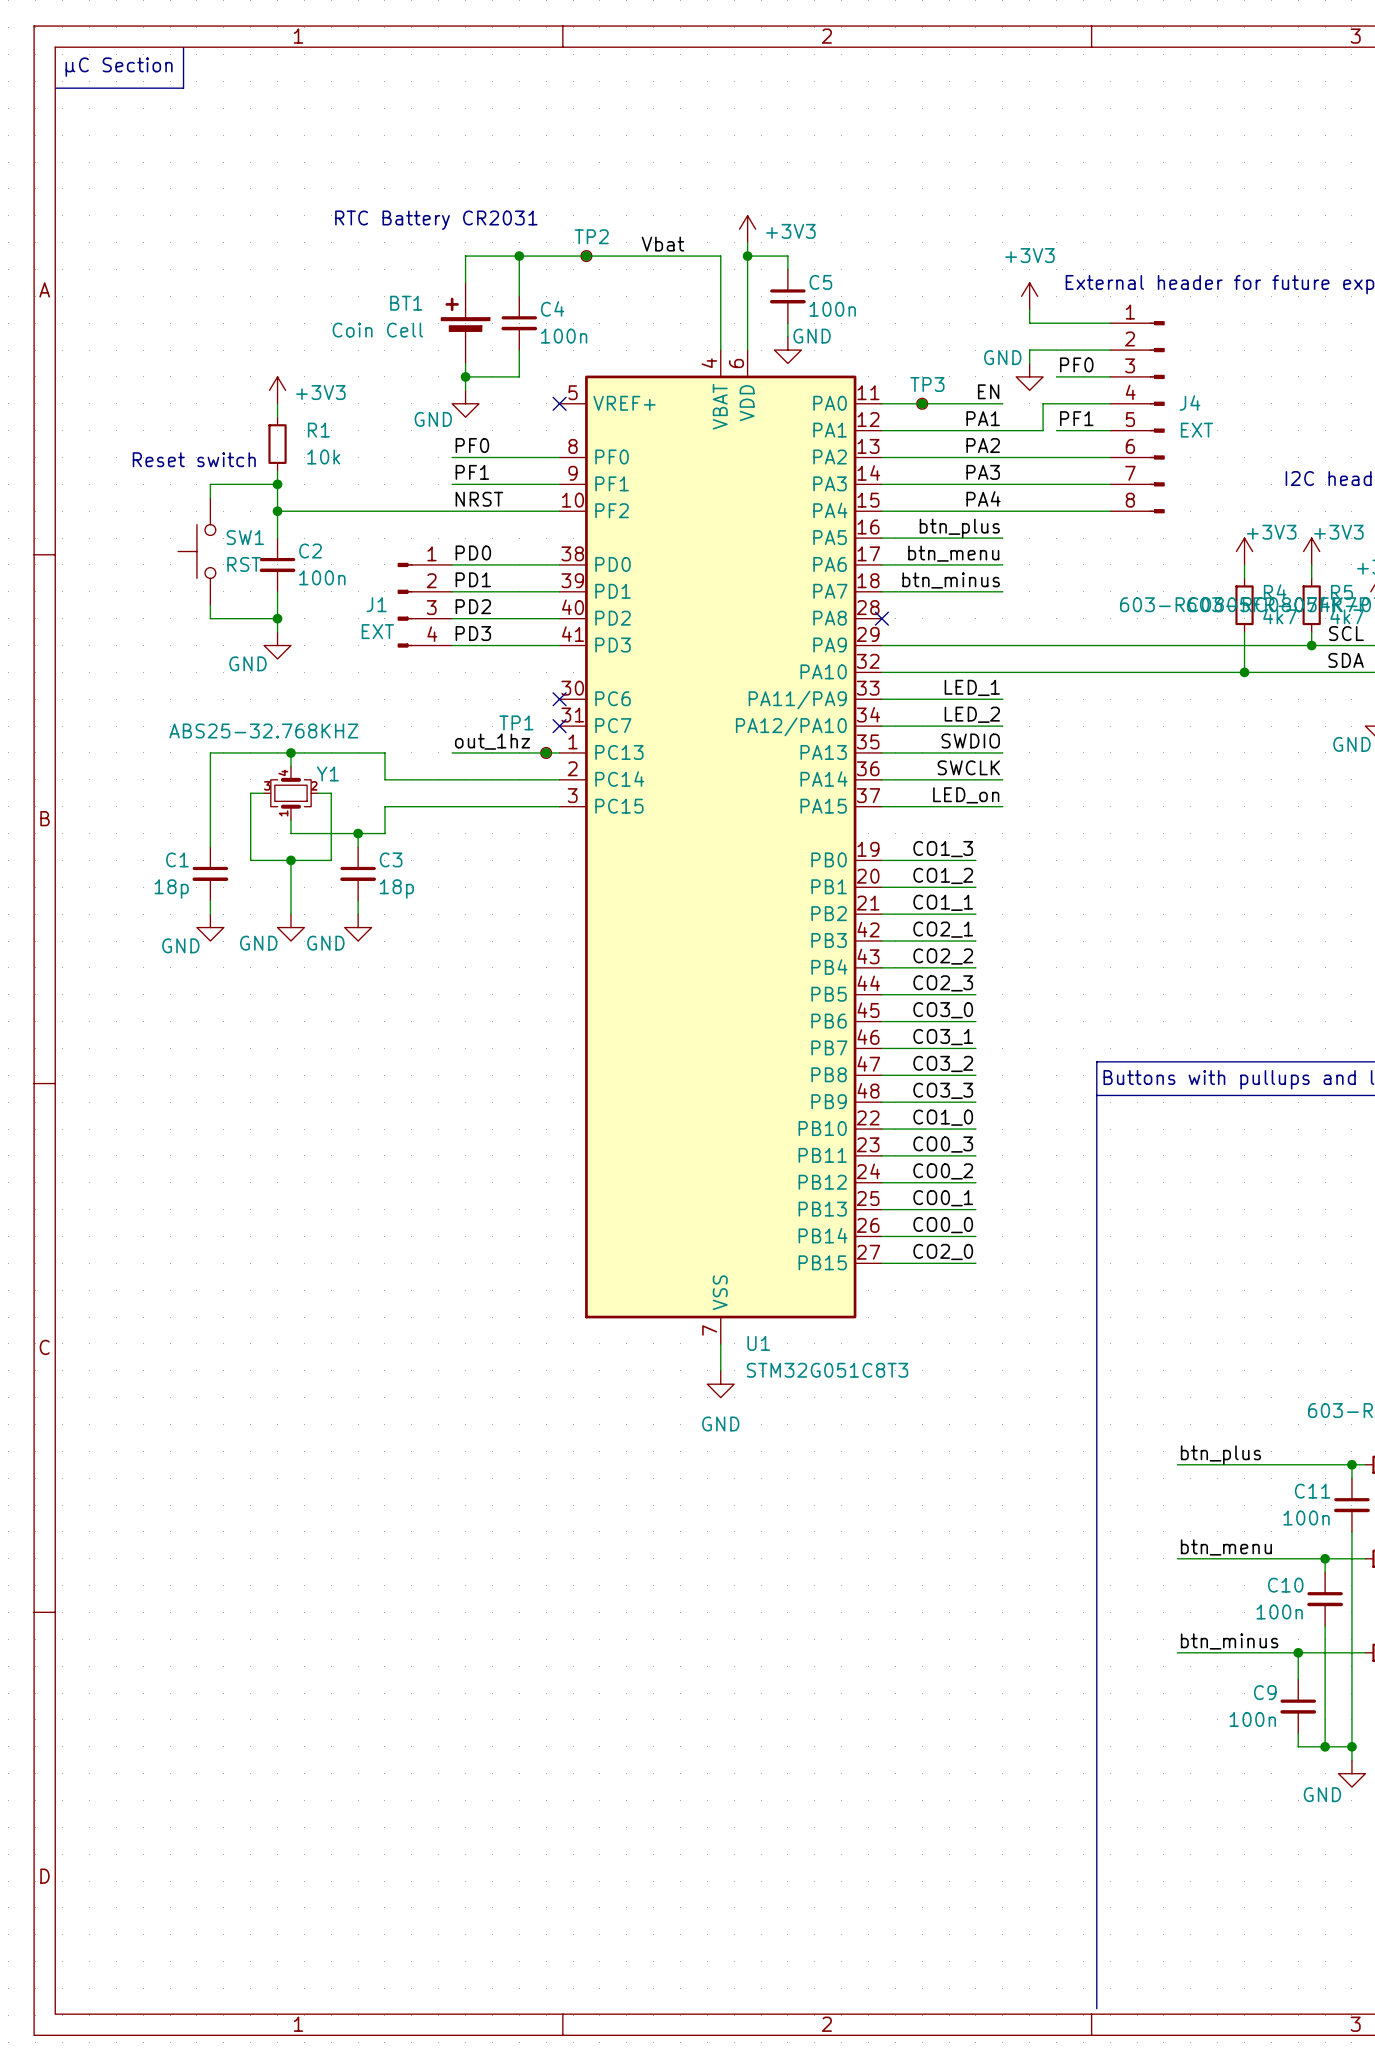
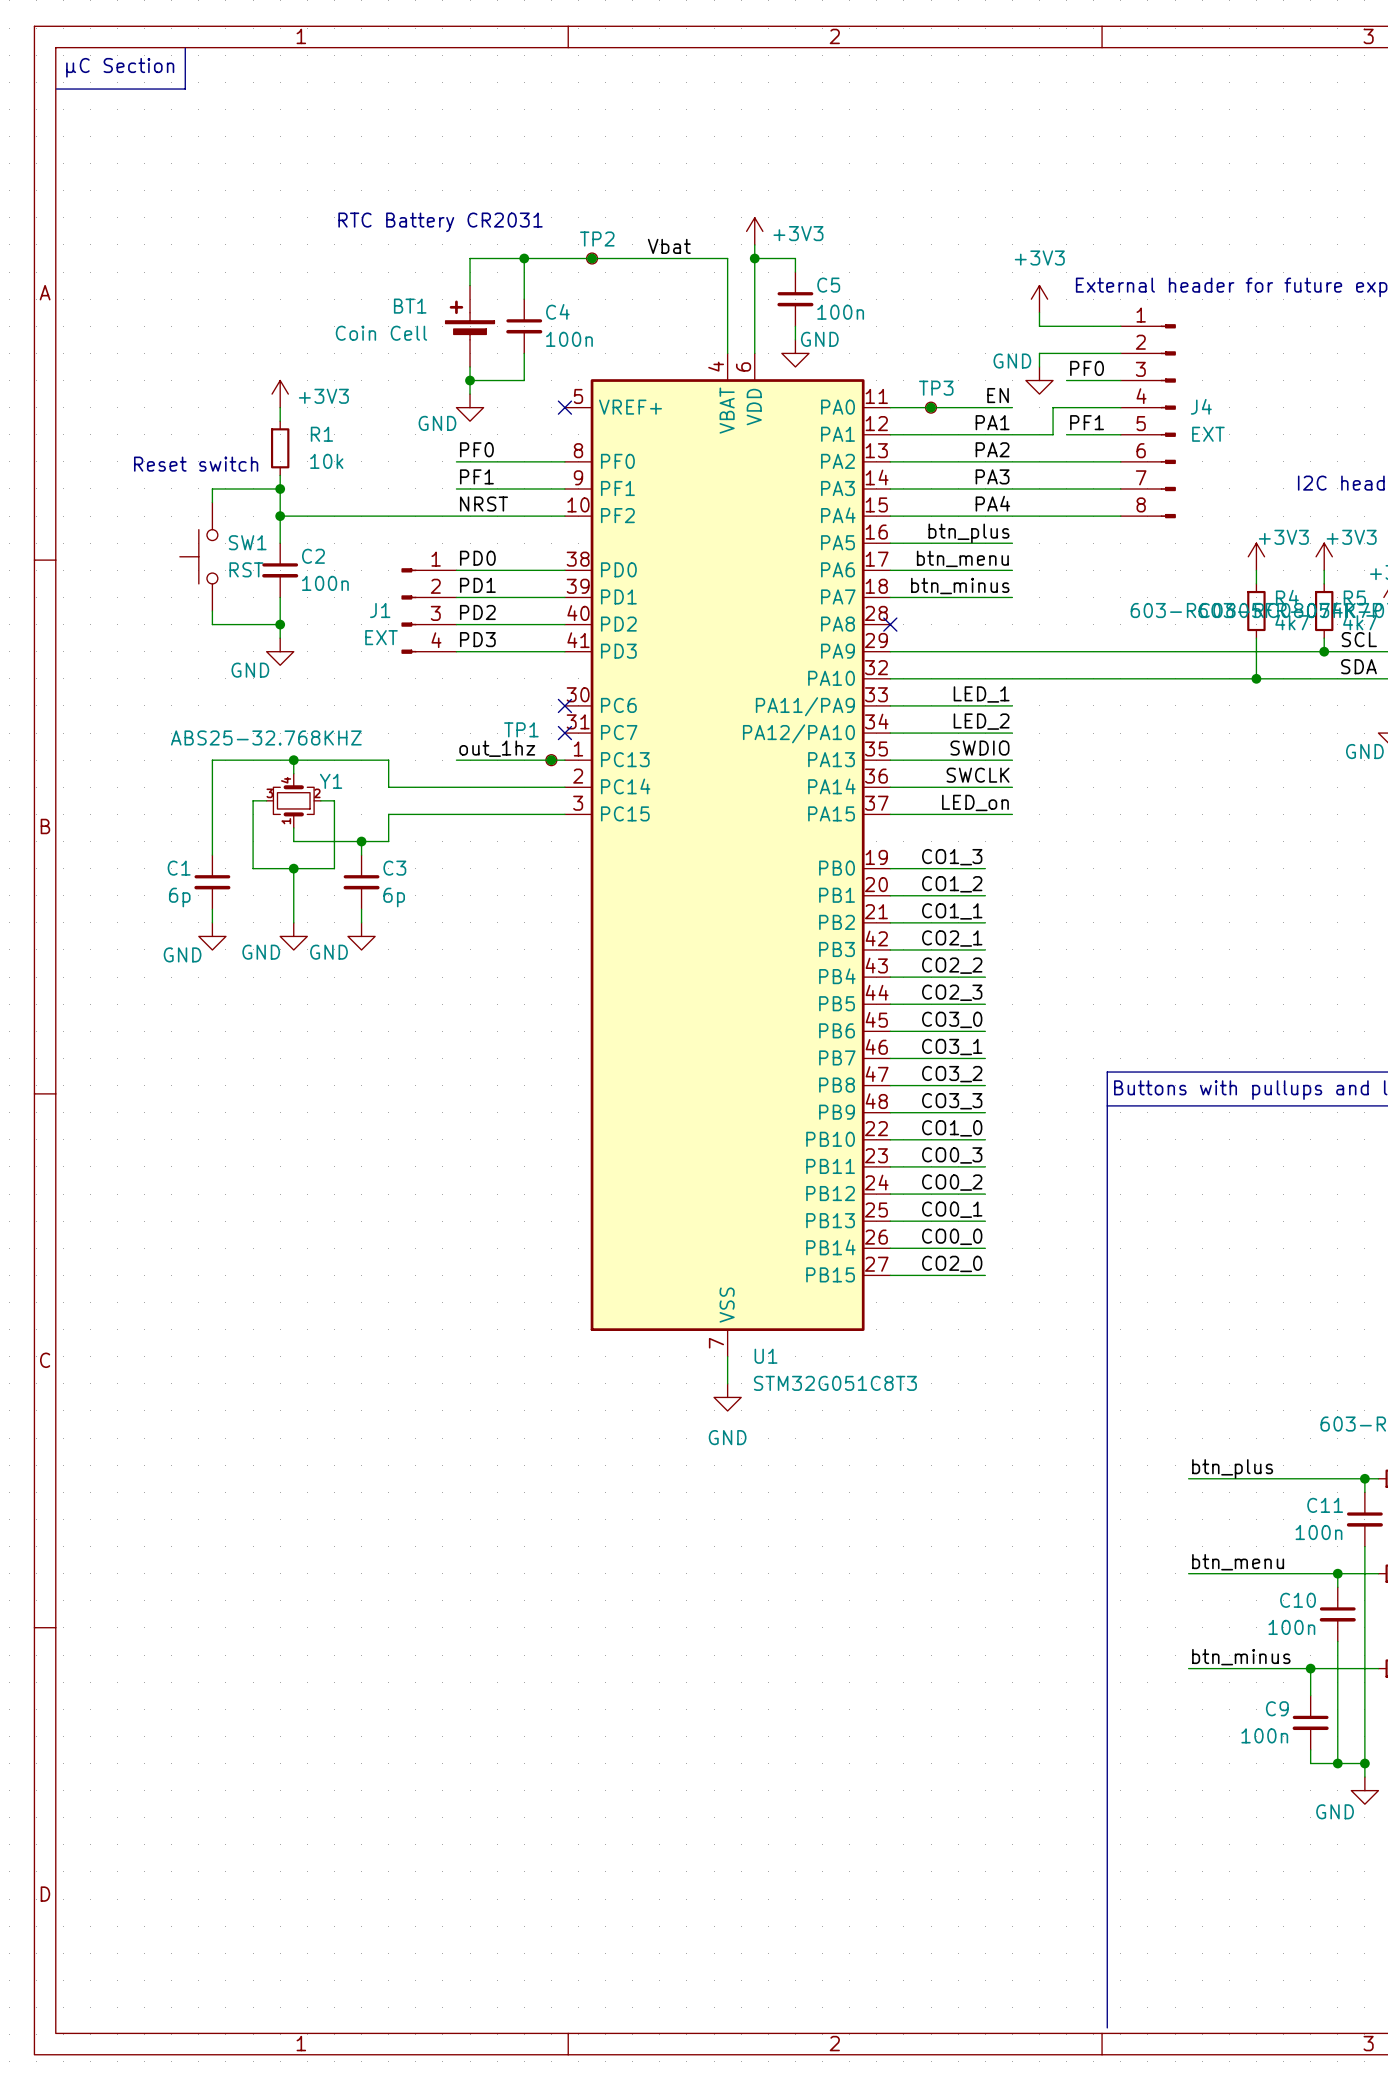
C1 value: 18p (171, 889) -> 6p (179, 897)
C3 value: 18p (396, 889) -> 6p (394, 897)

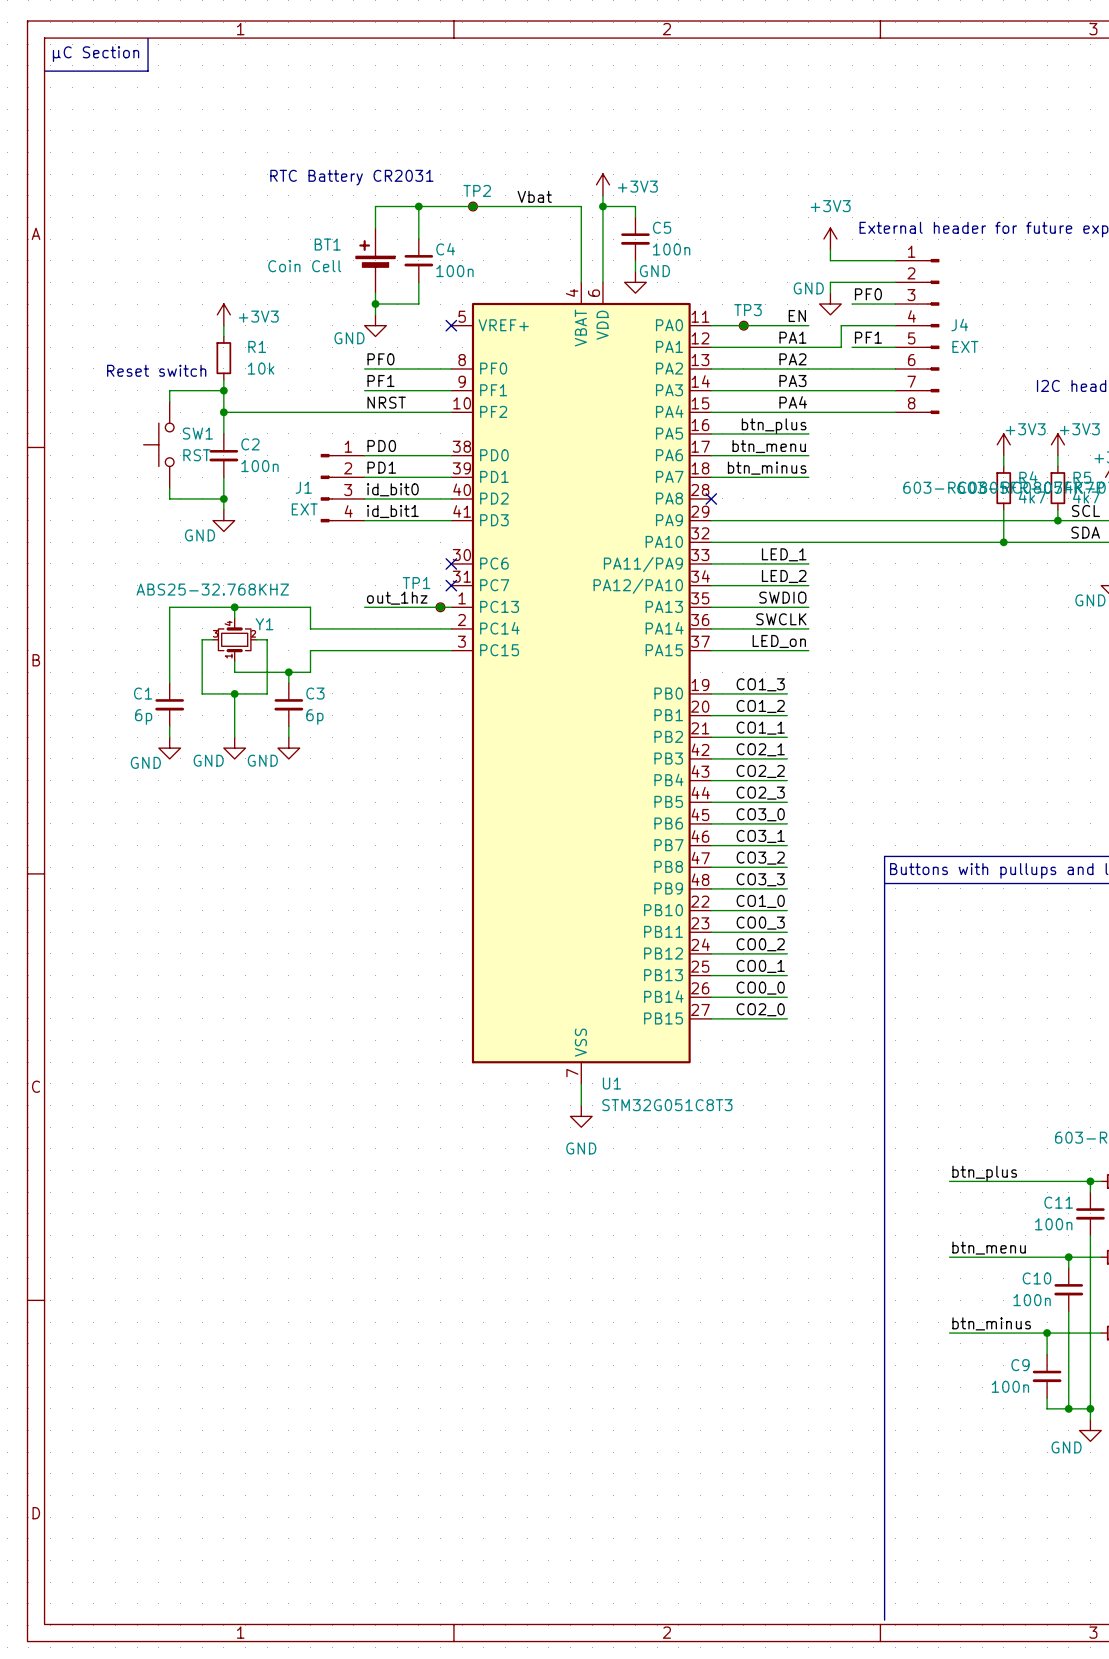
label: PD2 (477, 612) -> id_bit0 (392, 489)
label: PD3 (477, 639) -> id_bit1 (392, 511)

